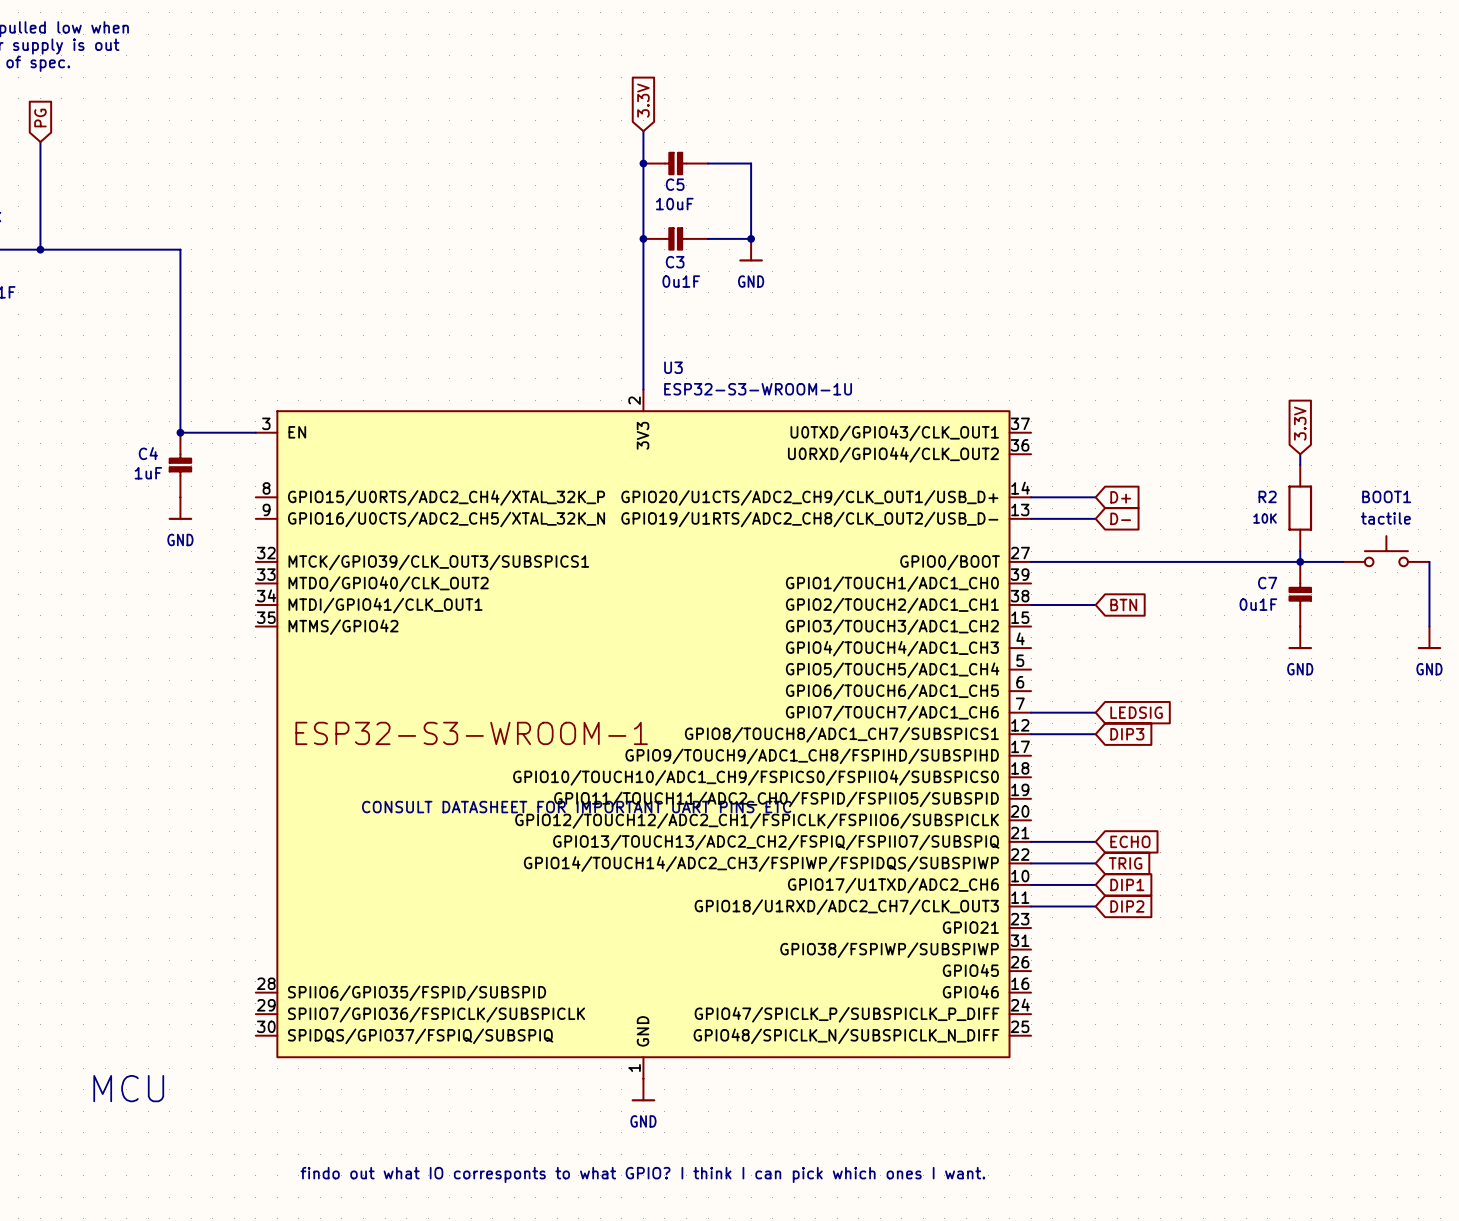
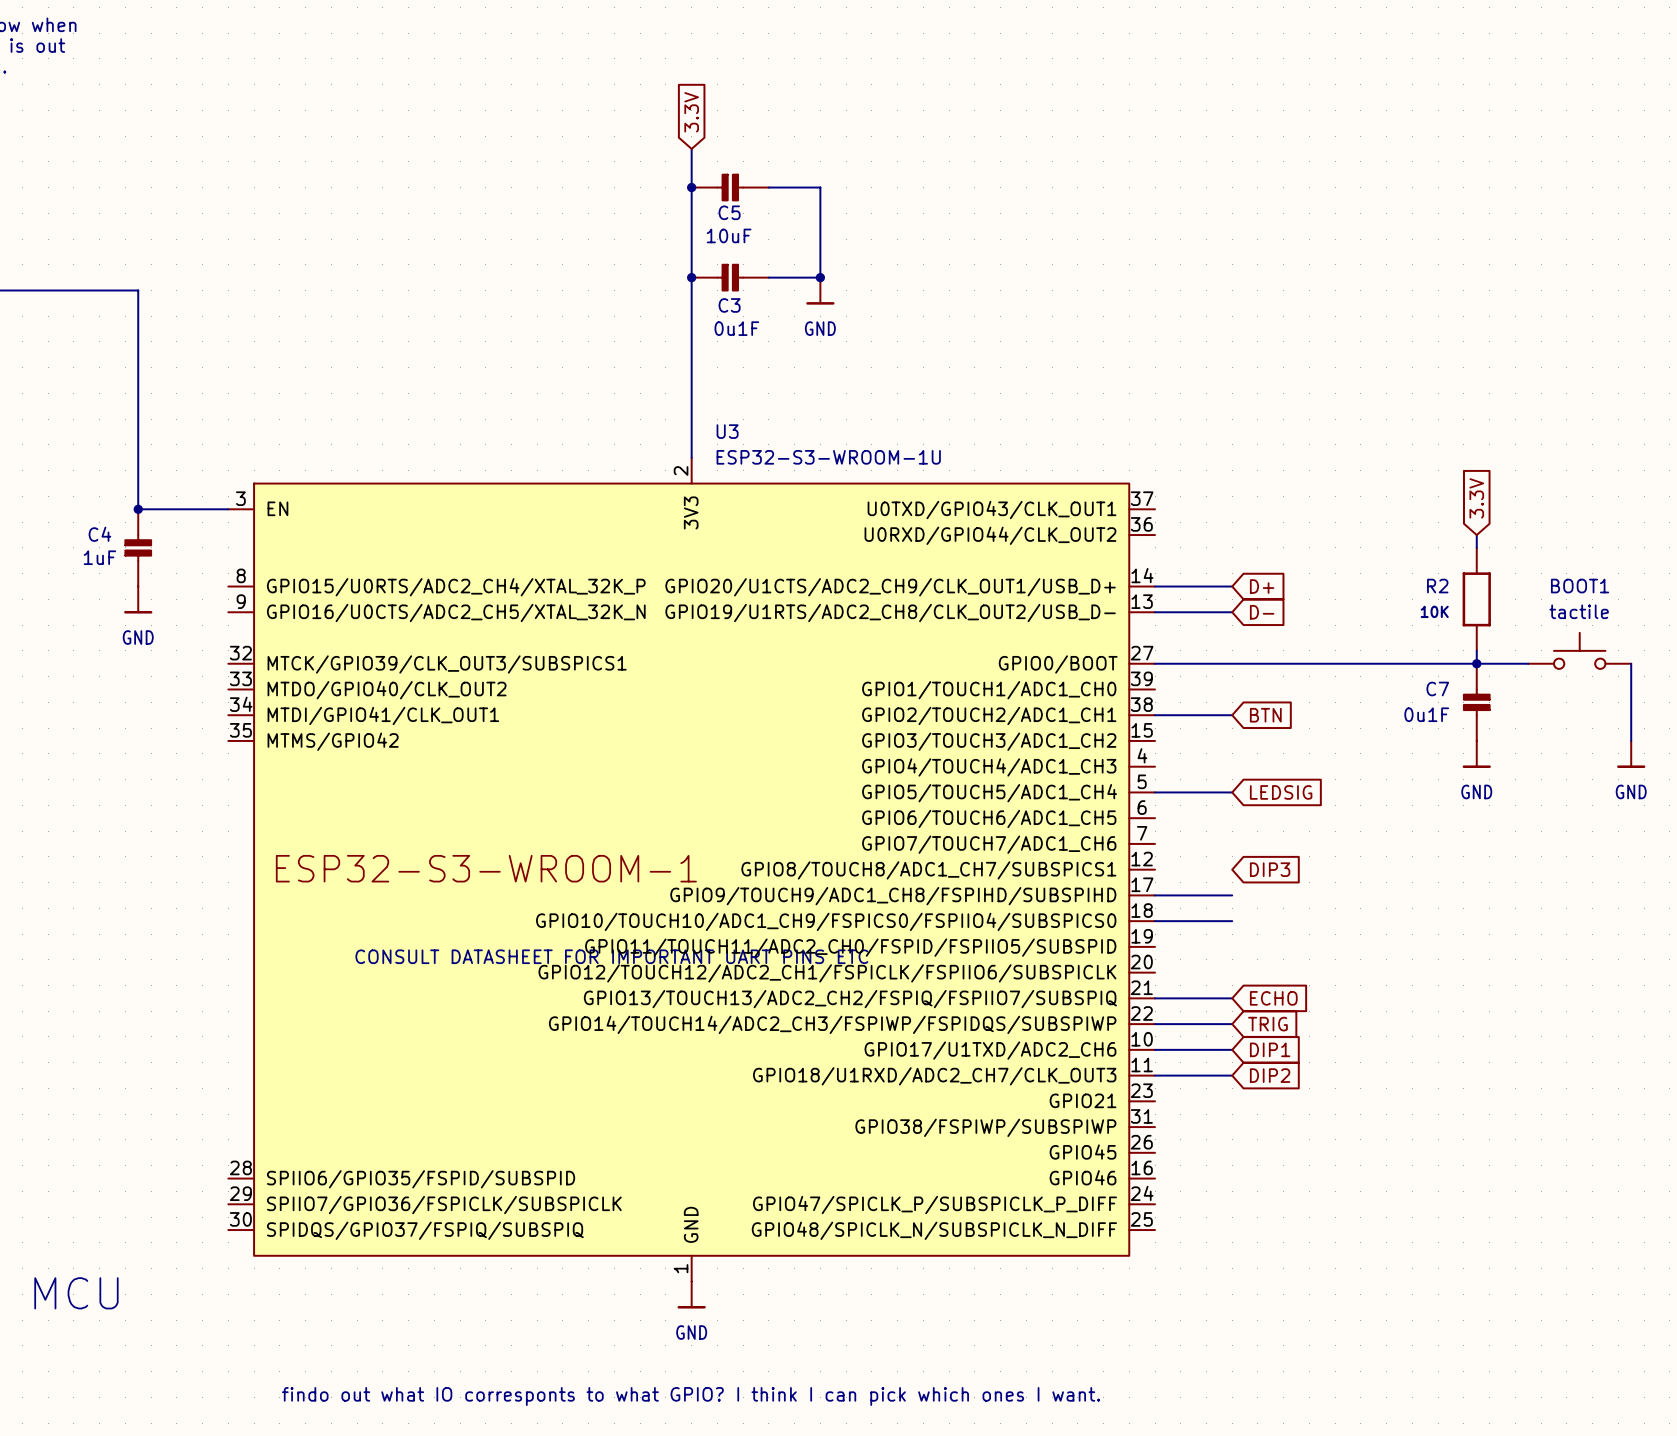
wire: none -> (1155, 792) (1232, 792)
wire: (1031, 712) (1095, 712) -> (1155, 895) (1232, 895)
global label position: LEDSIG (1136, 712) -> LEDSIG (1281, 792)
wire: (1031, 734) (1095, 734) -> (1155, 921) (1232, 921)

